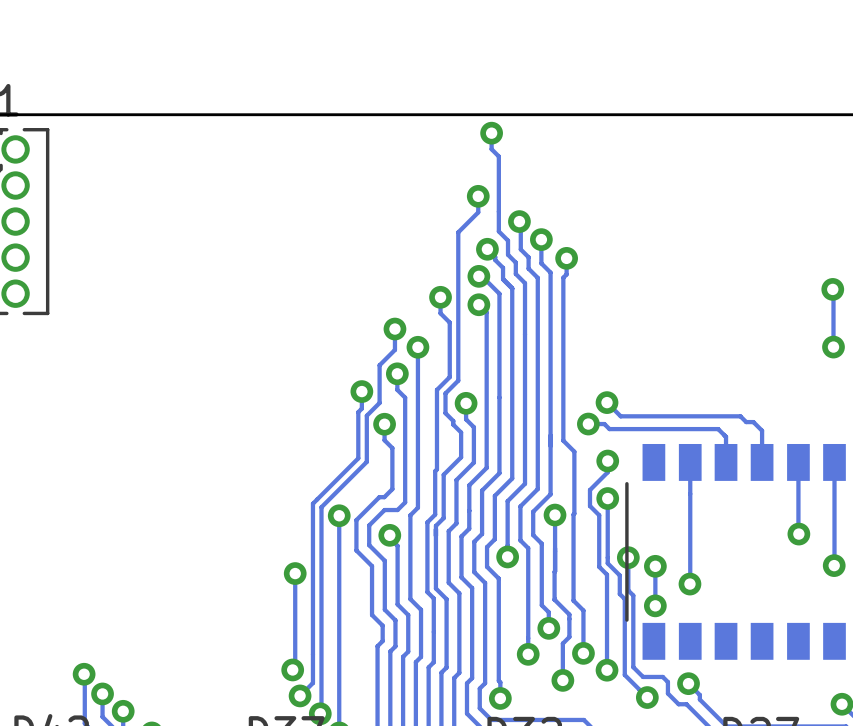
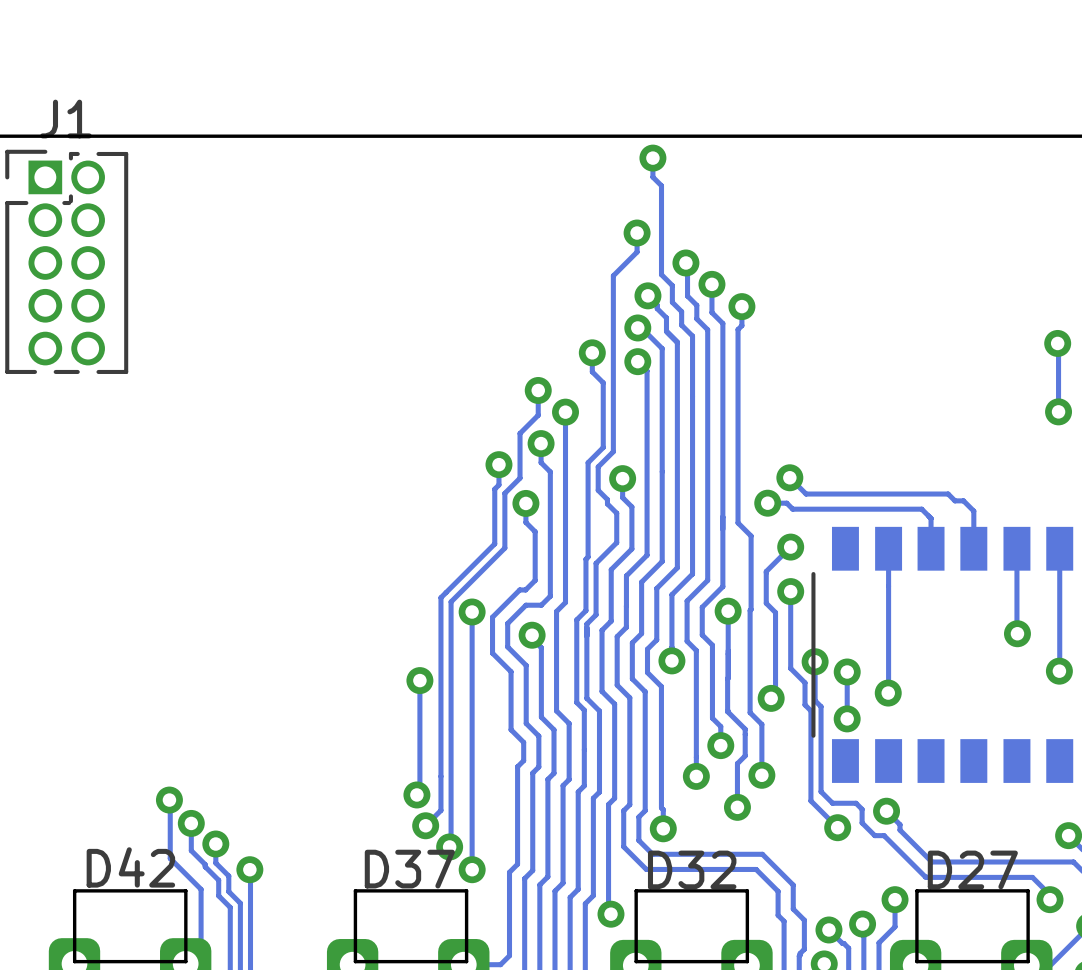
track: (607, 461) (607, 472) (589, 490) (589, 506) (599, 515) (599, 566) (607, 574) (607, 670) -> (790, 547) (766, 571) (766, 603) (775, 612) (775, 694) (771, 698)
via position: (607, 670) -> (771, 698)

